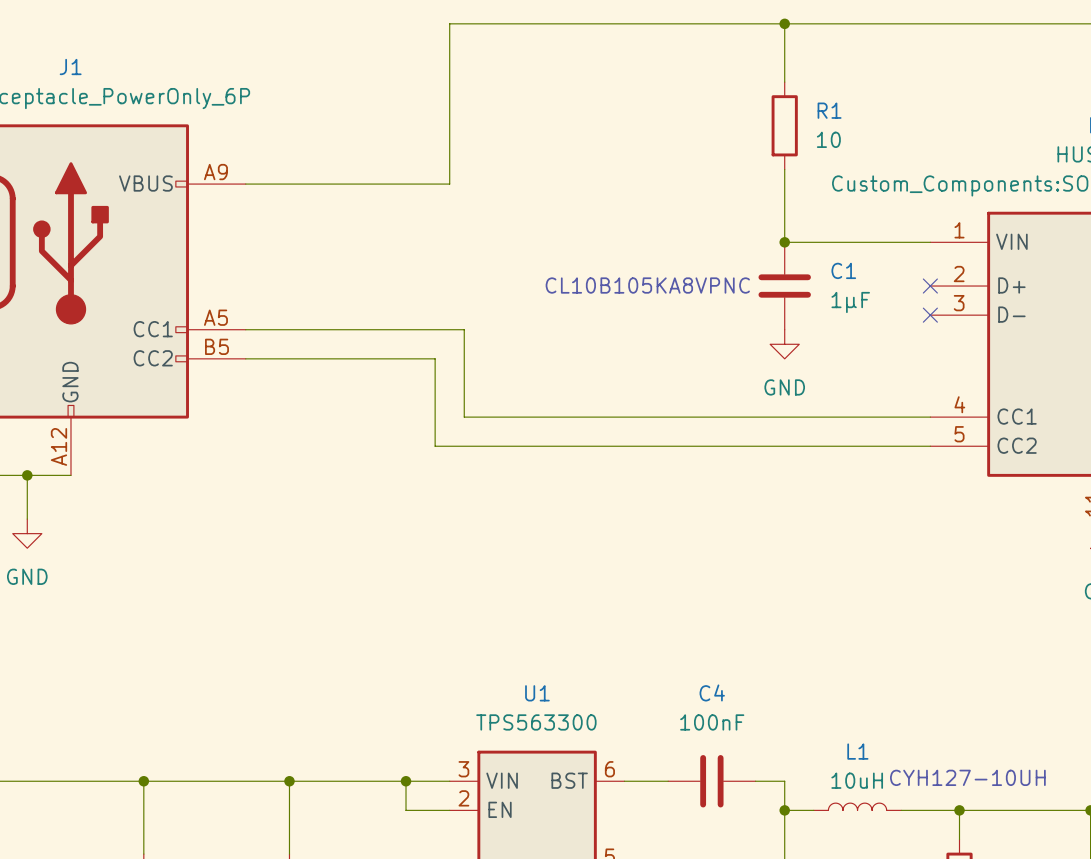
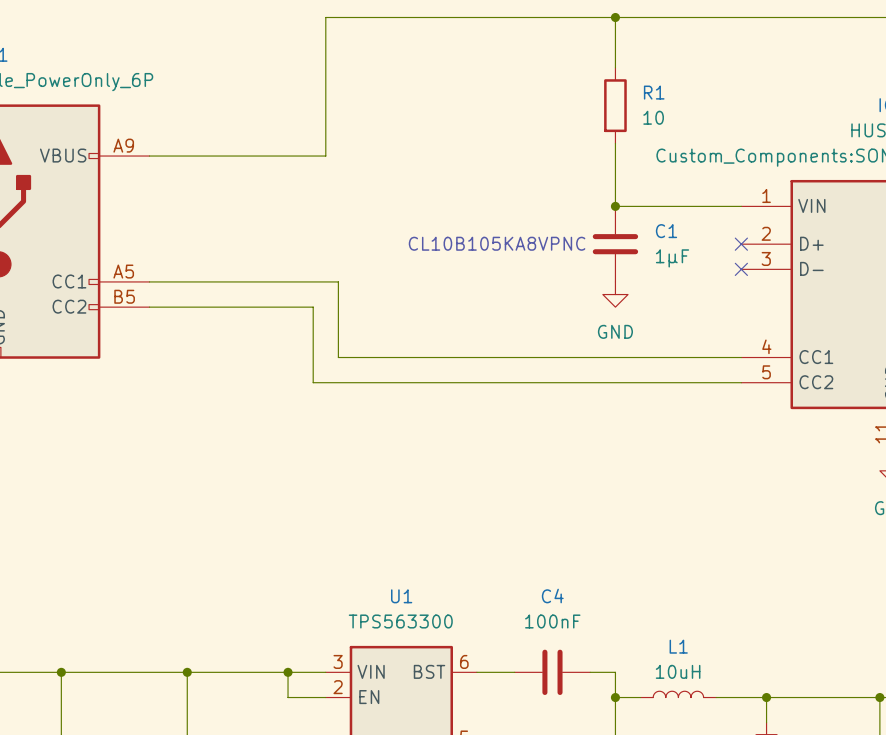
text: CYH127-10UH (967, 777) -> none

